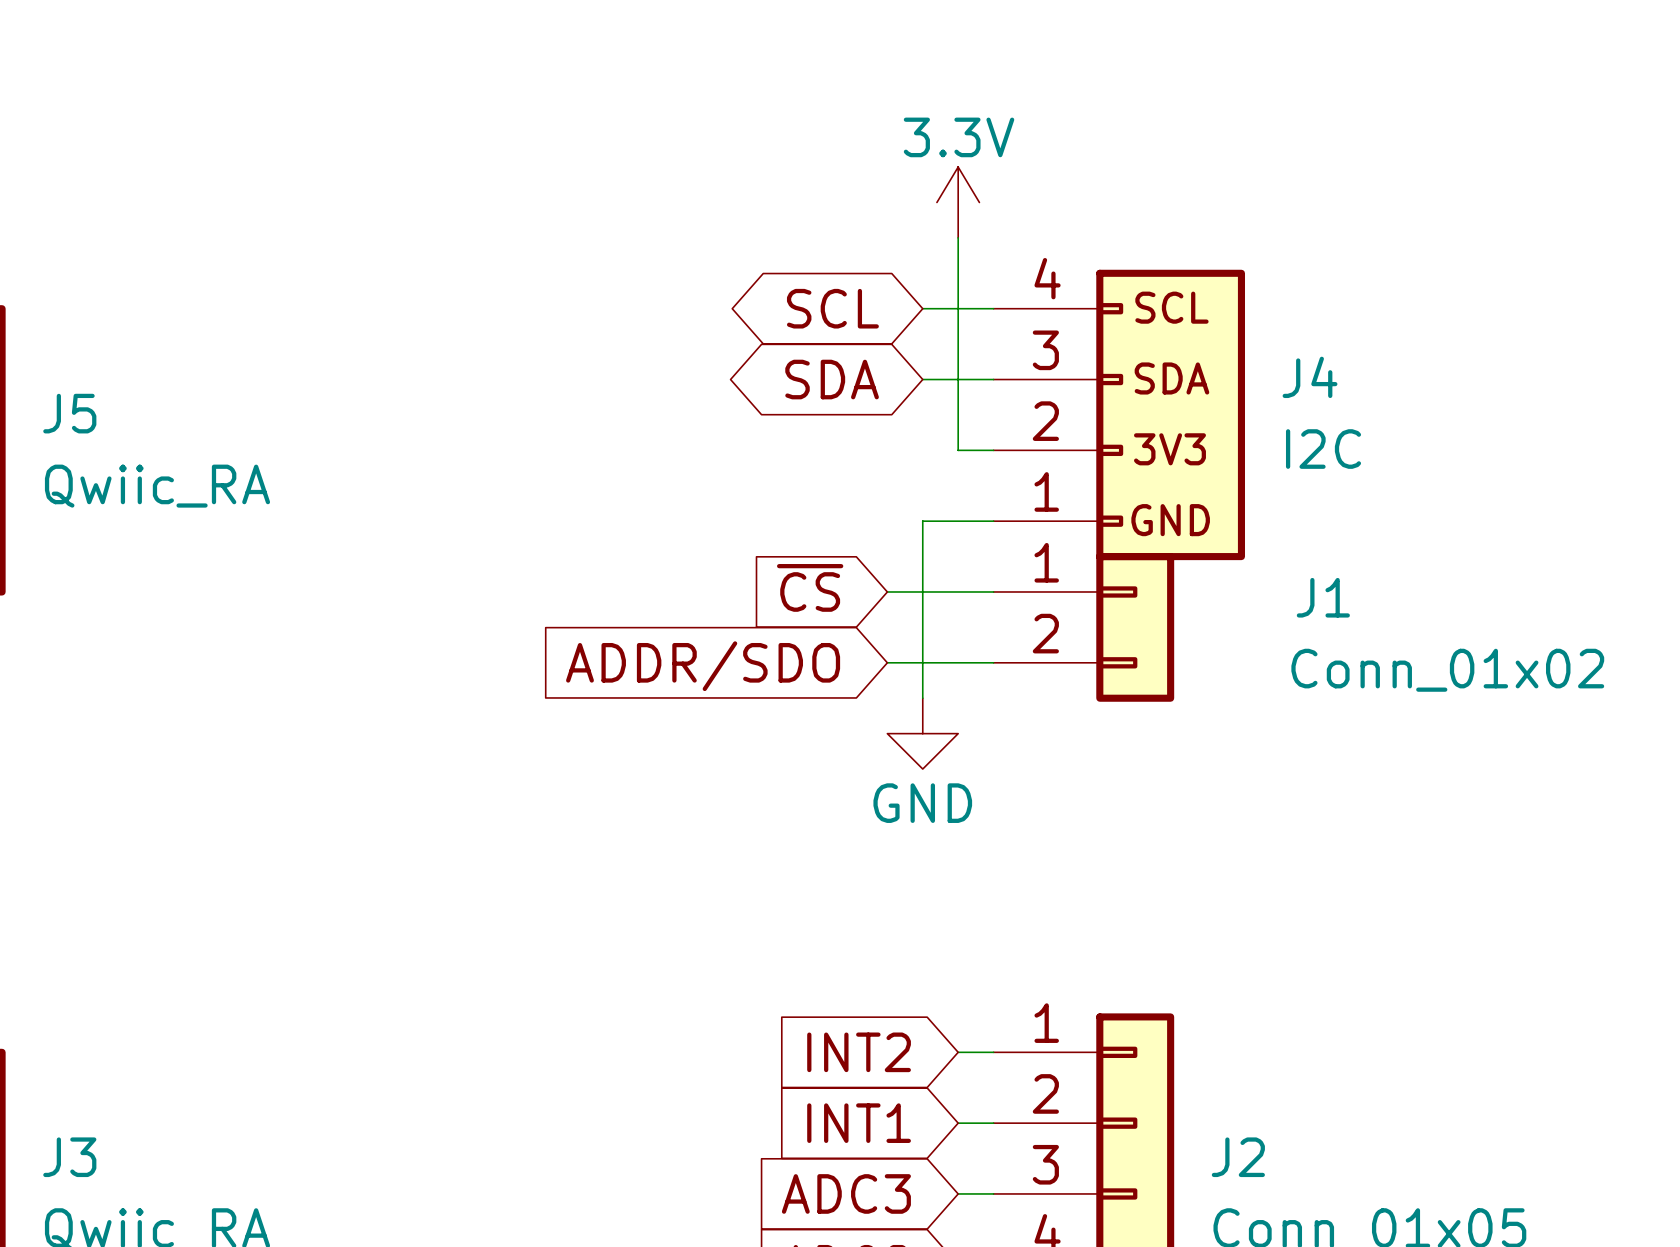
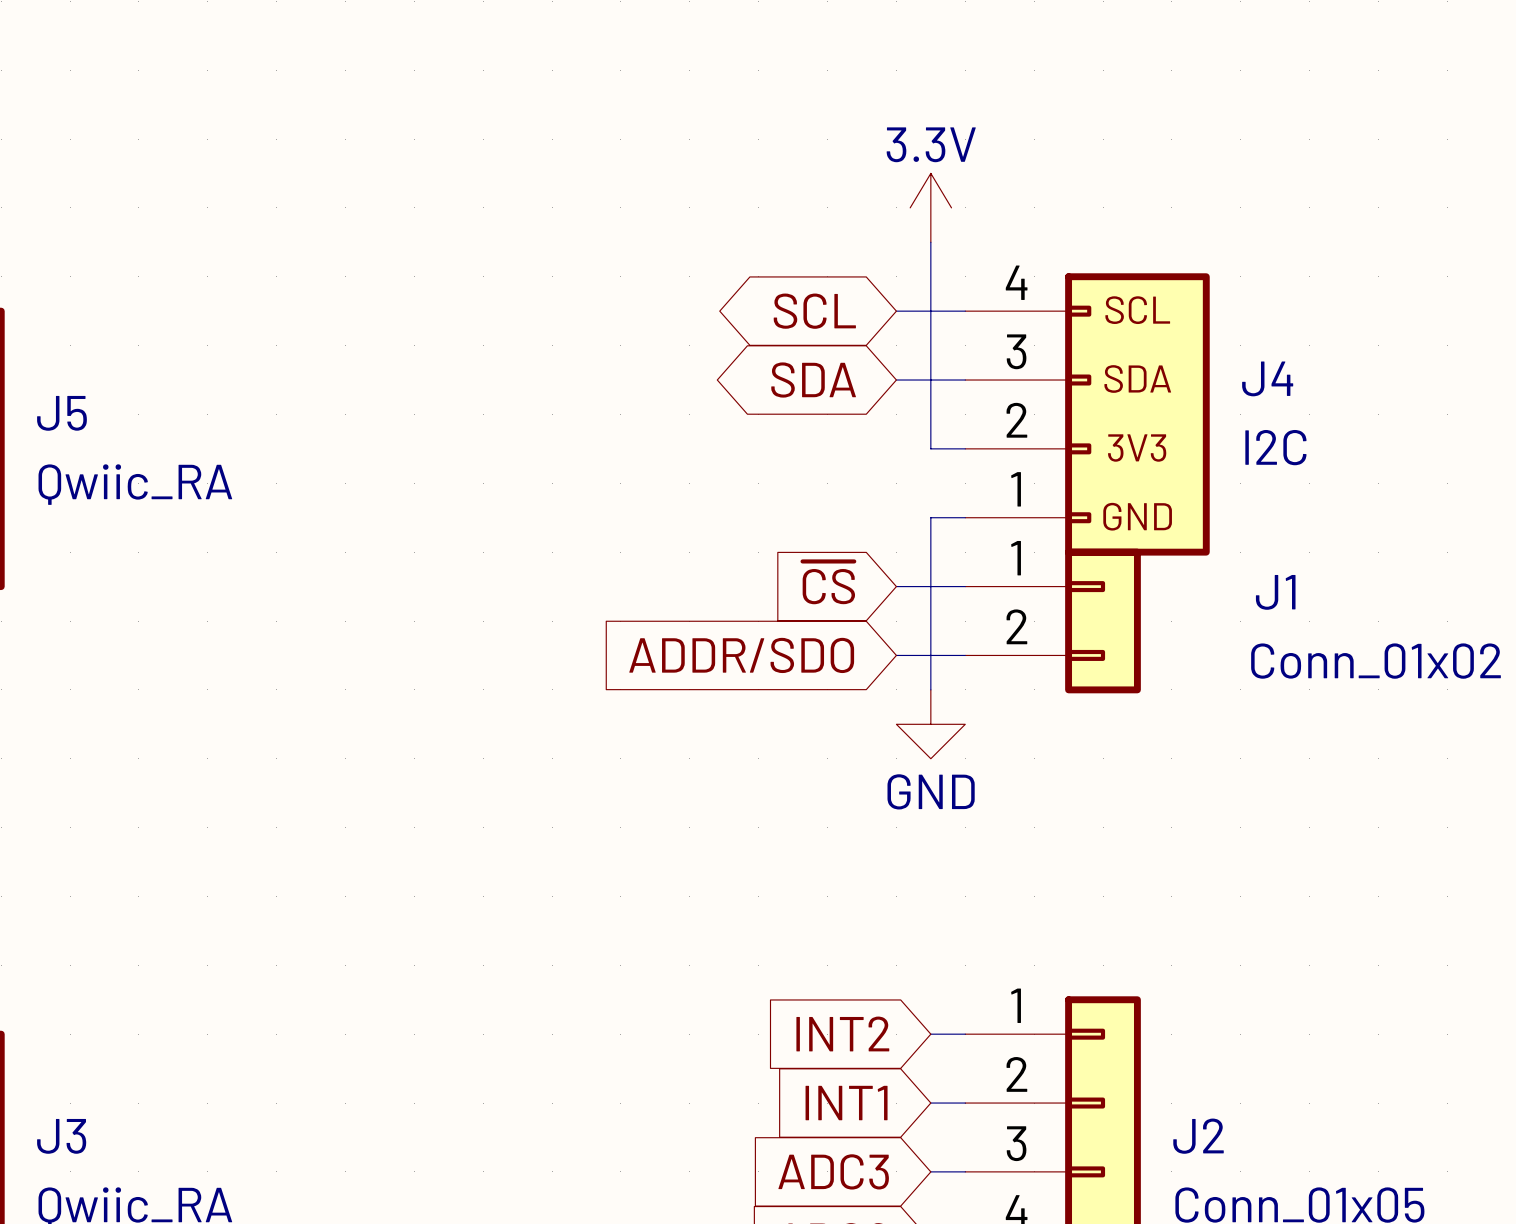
wire: (958, 521) (922, 521) (922, 698) -> (930, 517) (930, 689)
global label position: ~{CS} (810, 587) -> ~{CS} (828, 582)
wire: (887, 591) (922, 591) -> none
wire: (887, 662) (922, 662) -> none
global label position: ADDR/SDO (703, 666) -> ADDR/SDO (741, 655)
power symbol position: GND (922, 733) -> GND (930, 724)

